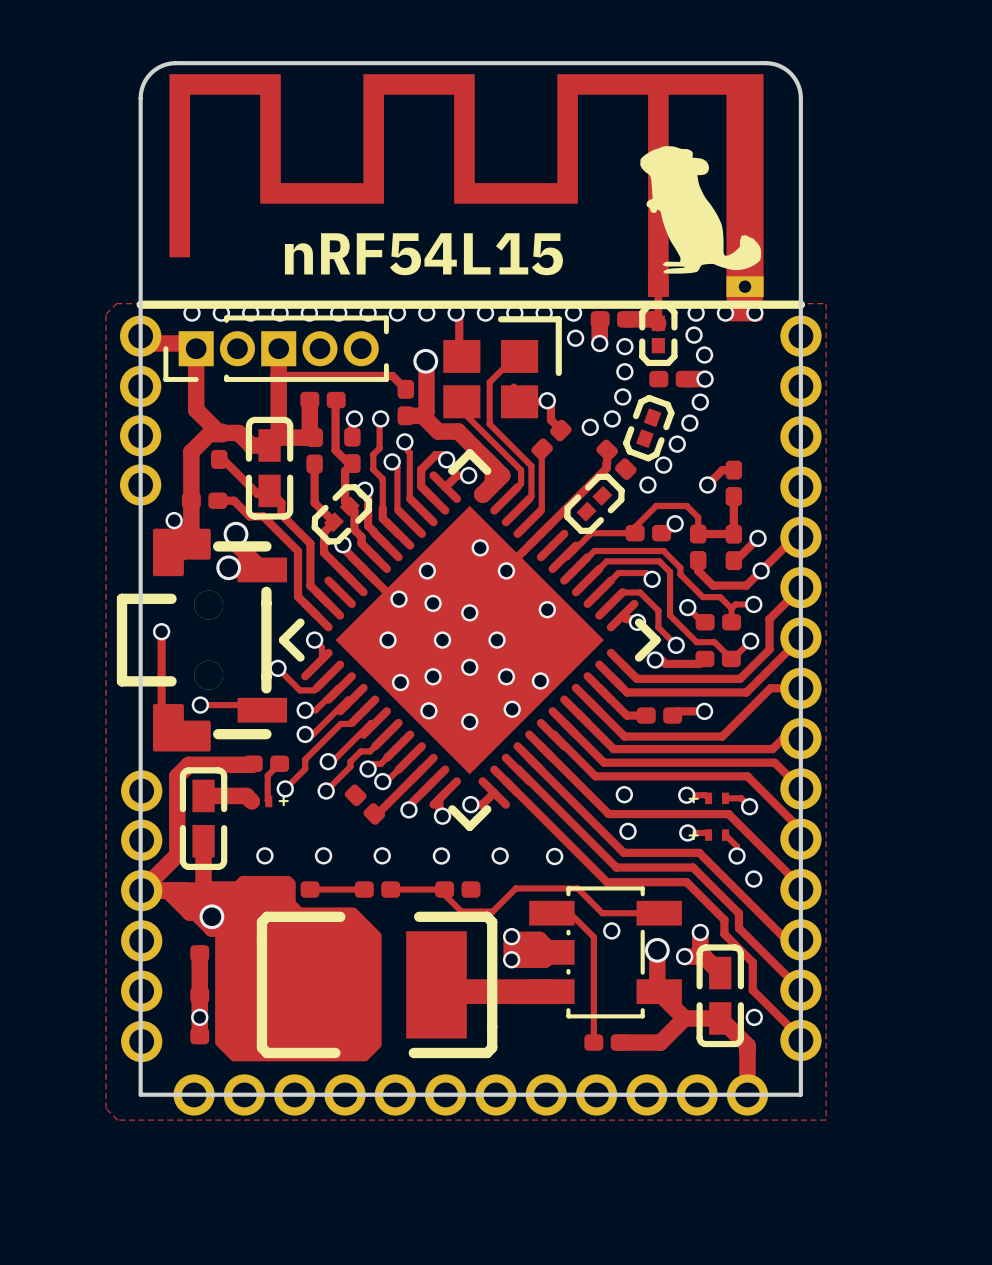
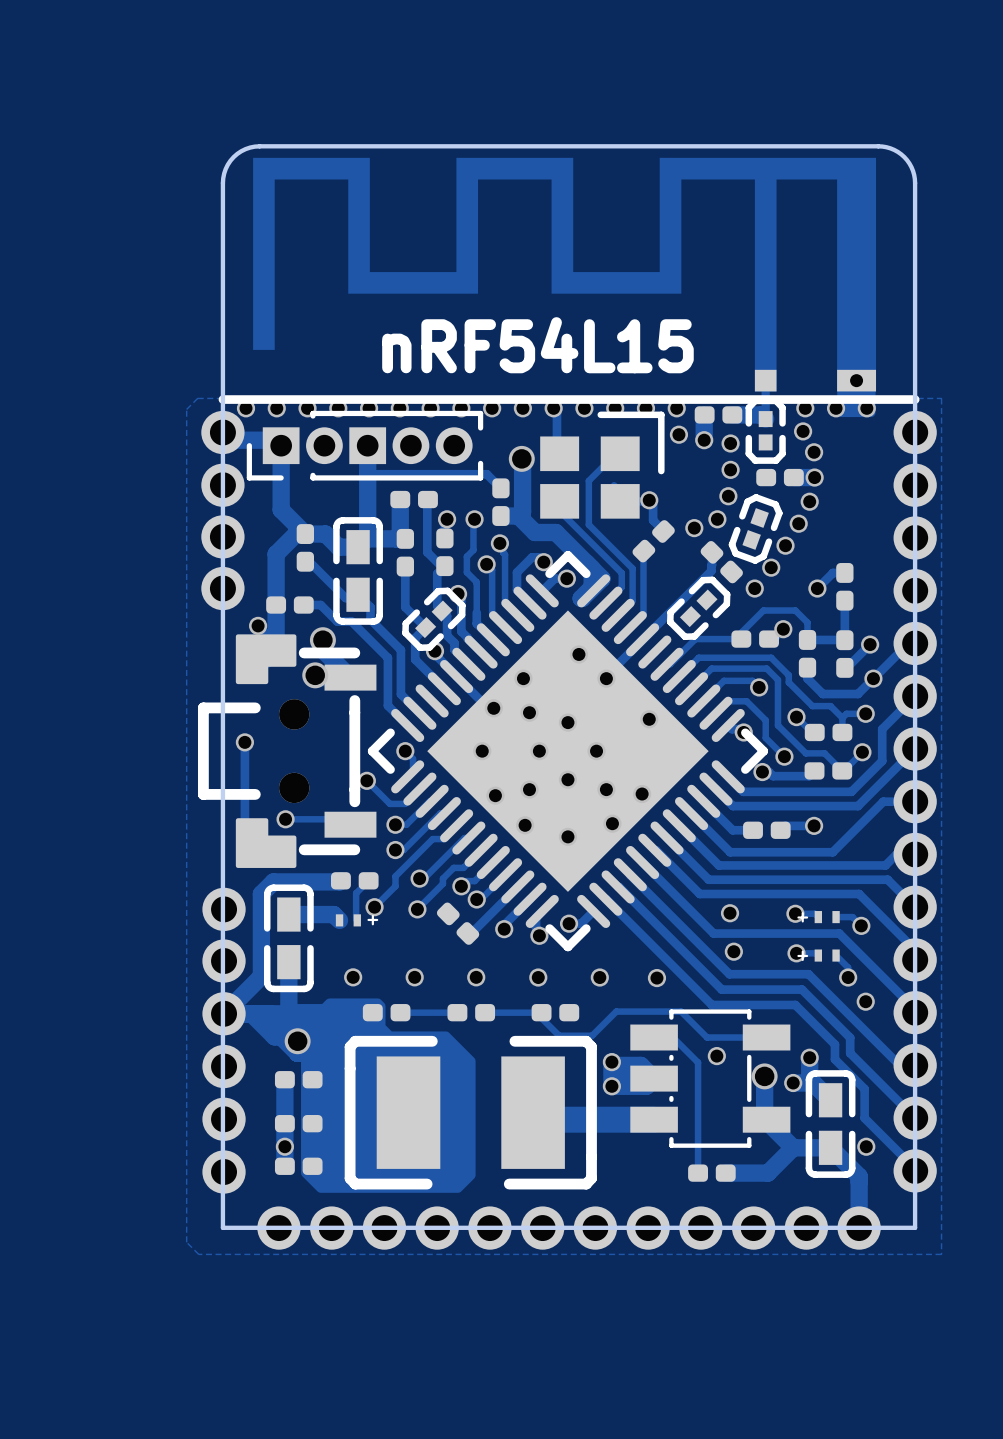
drawing: [640, 146, 762, 274] -> none
via: none -> (246, 408)

